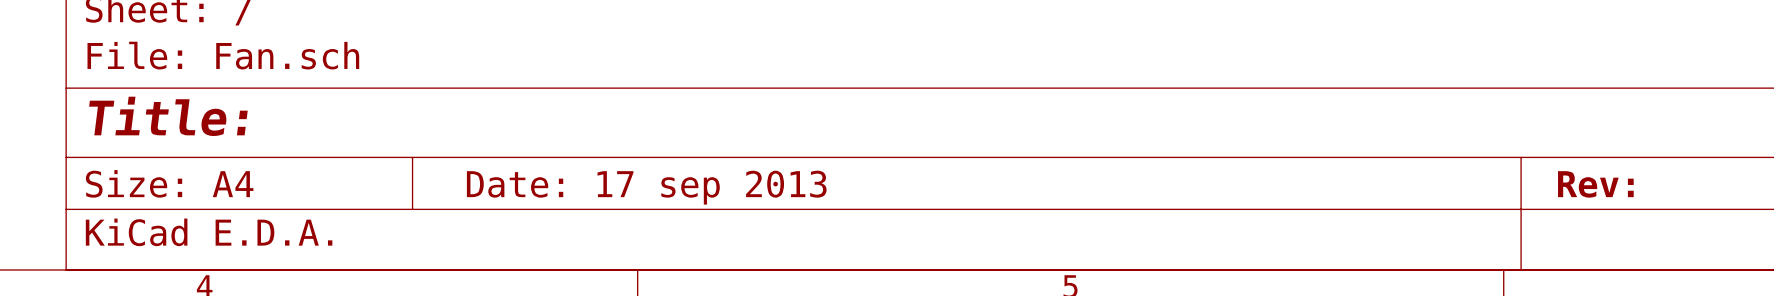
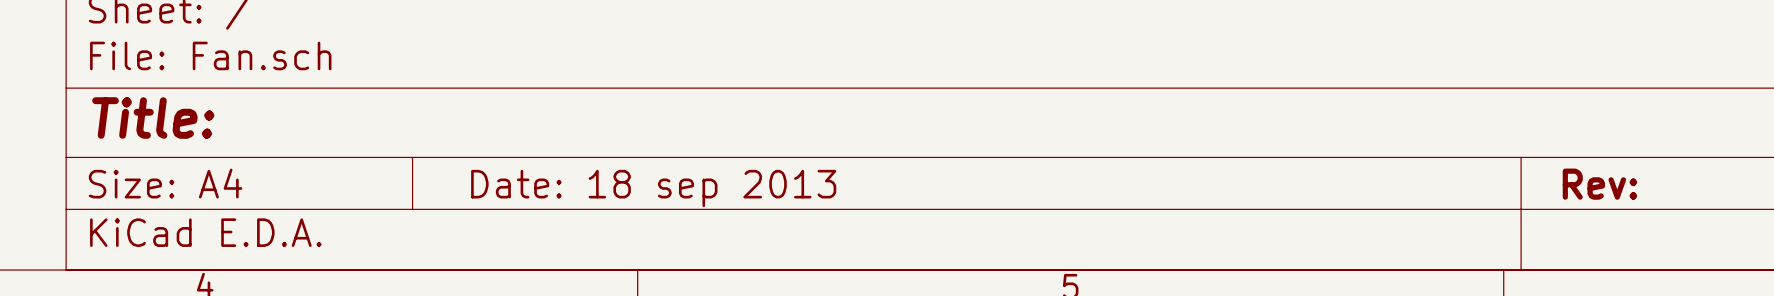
title block: Date: 17 sep 2013 (646, 187) -> Date: 18 sep 2013 (653, 188)

